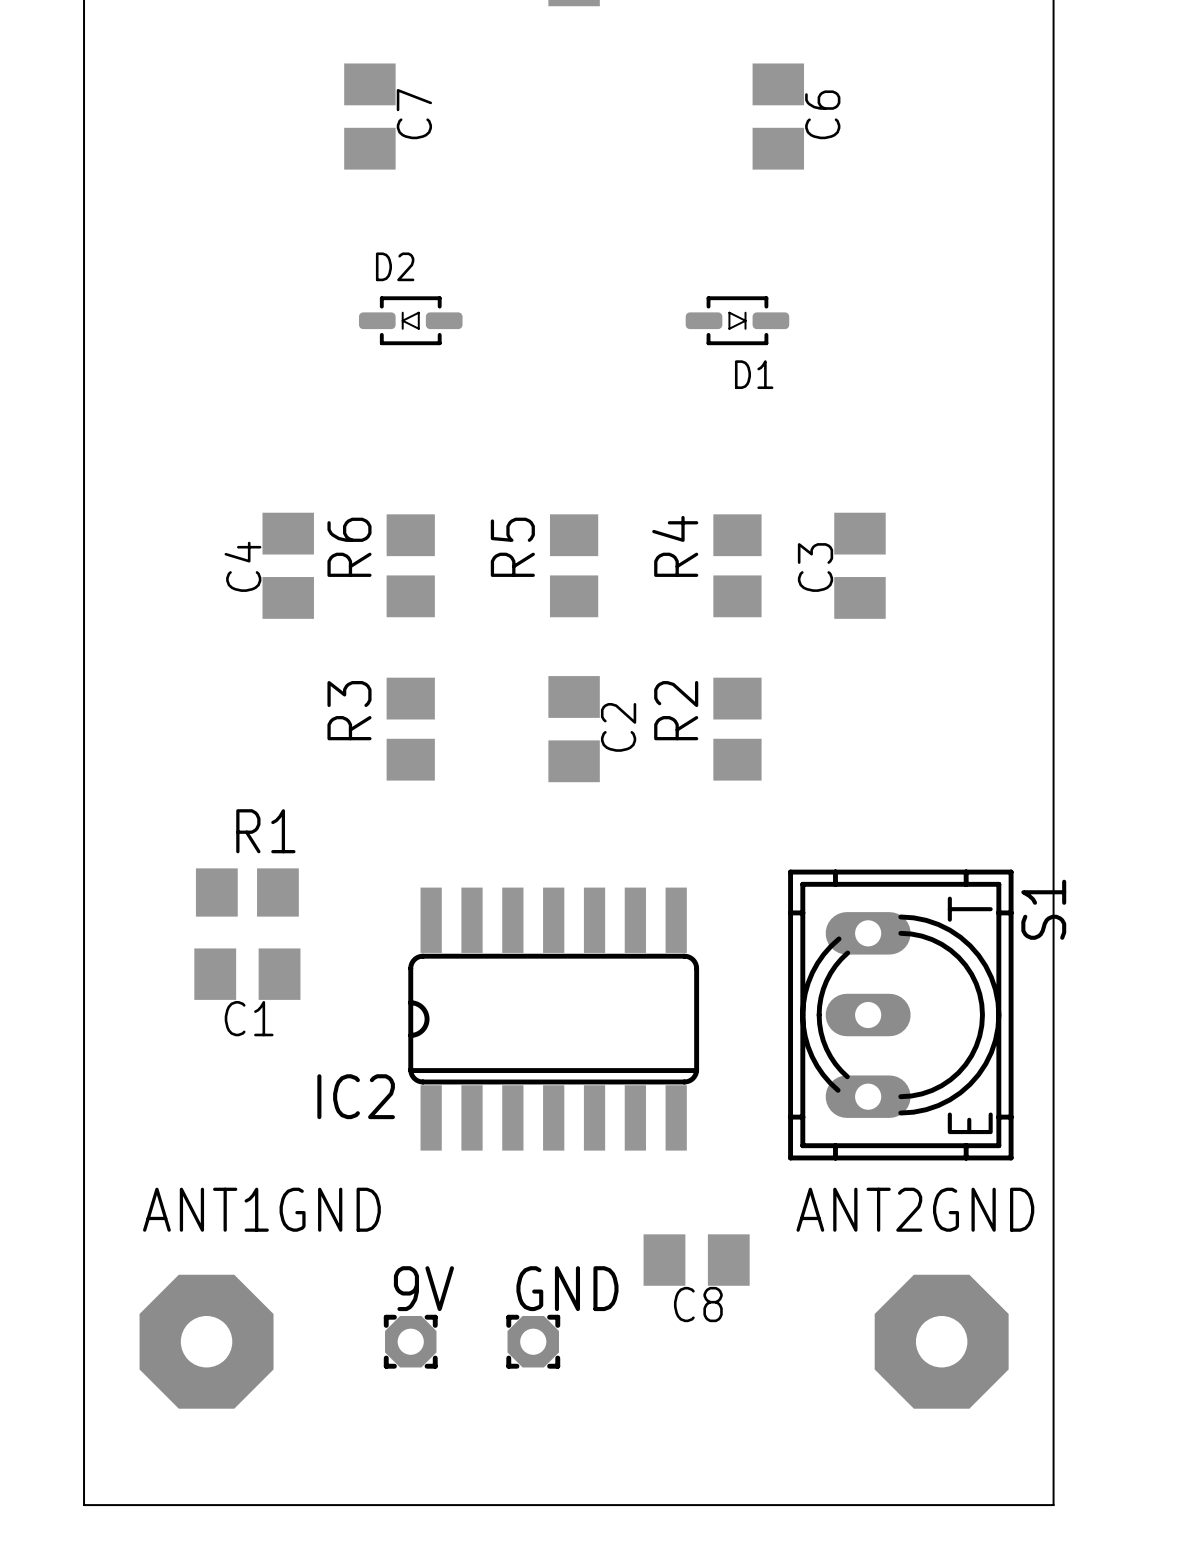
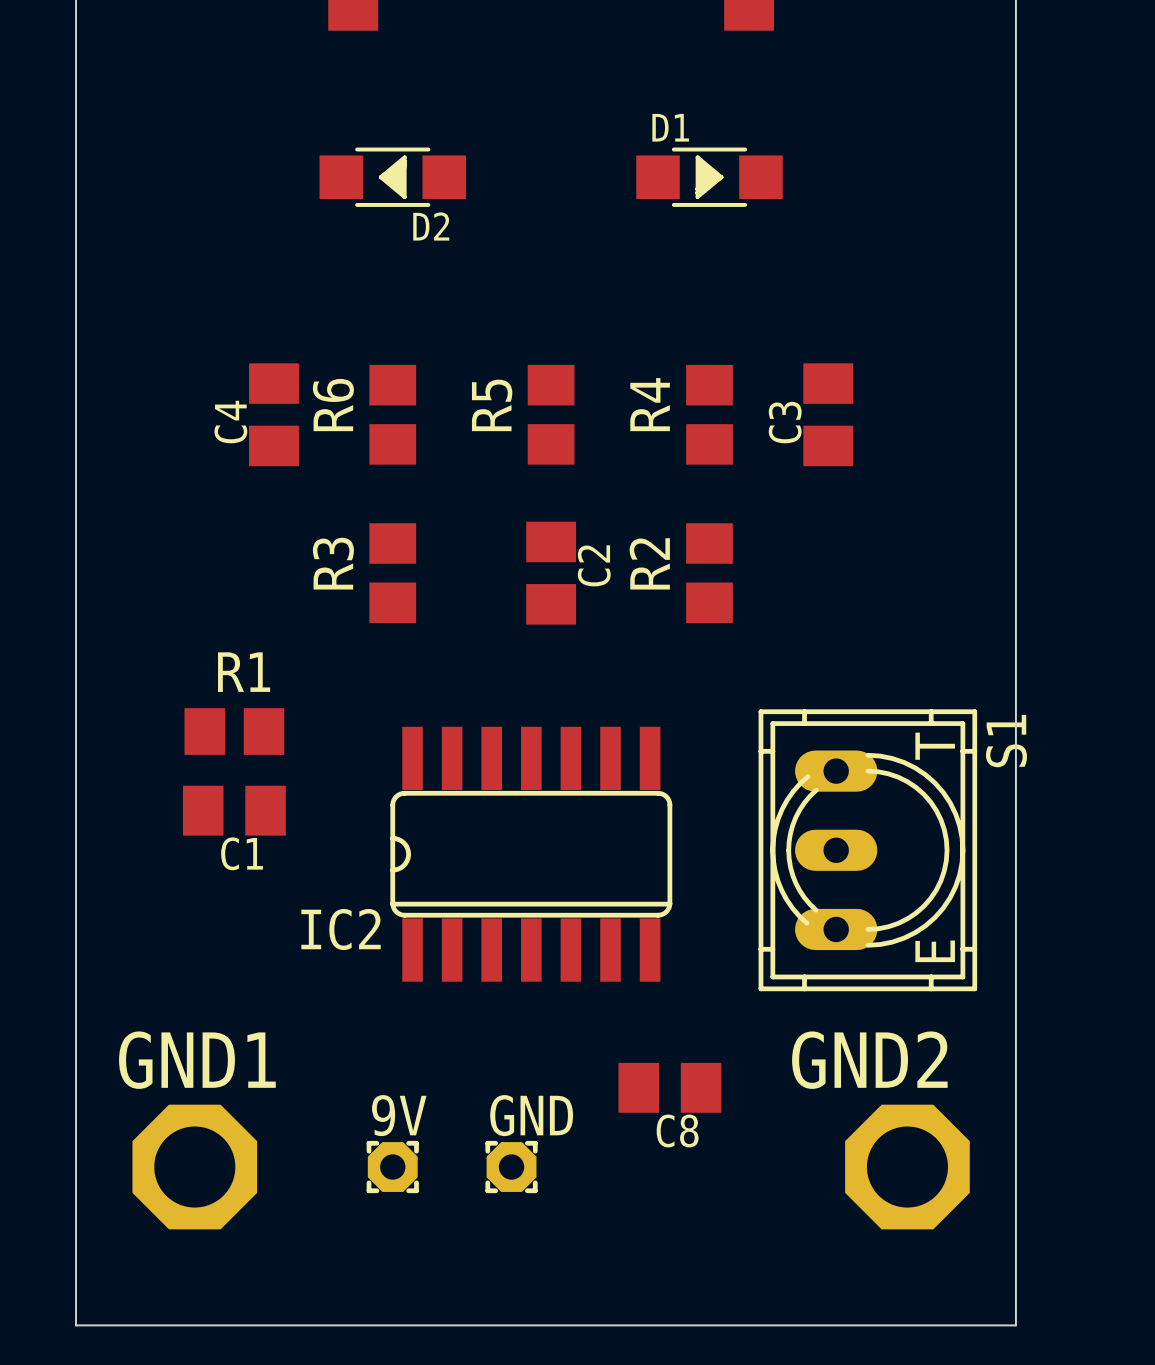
D2 name position: D2 (395, 266) -> D2 (431, 226)
D2 footprint: [358, 296, 463, 346] -> [319, 147, 467, 207]
D1 footprint: [685, 296, 790, 346] -> [636, 147, 783, 207]
D1 name position: D1 (754, 374) -> D1 (670, 127)
text: none -> GND1 (197, 1060)
text: none -> GND2 (869, 1060)
ANT1GND: (206, 1341) -> none
part: none -> (194, 1167)
ANT2GND: (941, 1341) -> none
part: none -> (907, 1167)

